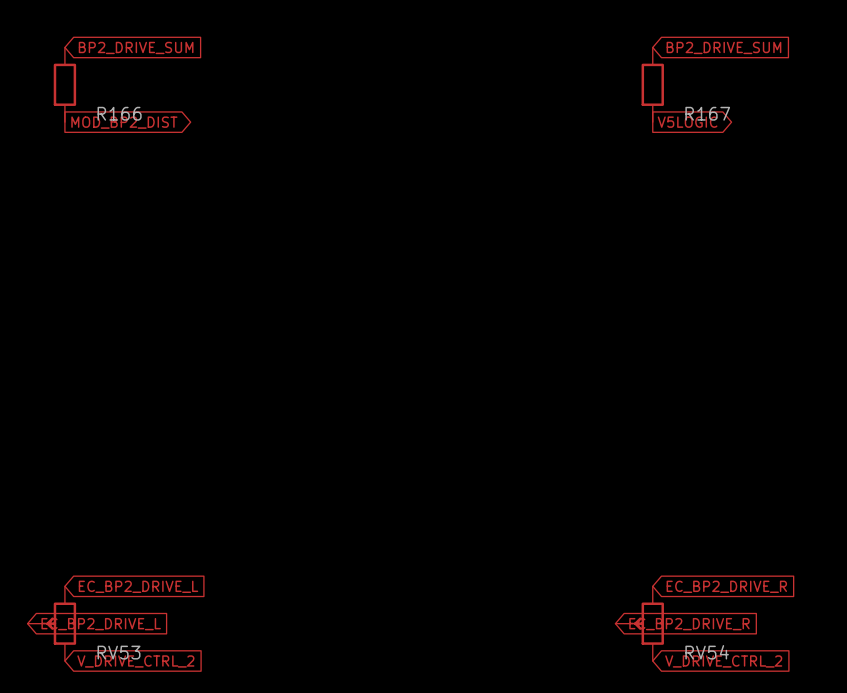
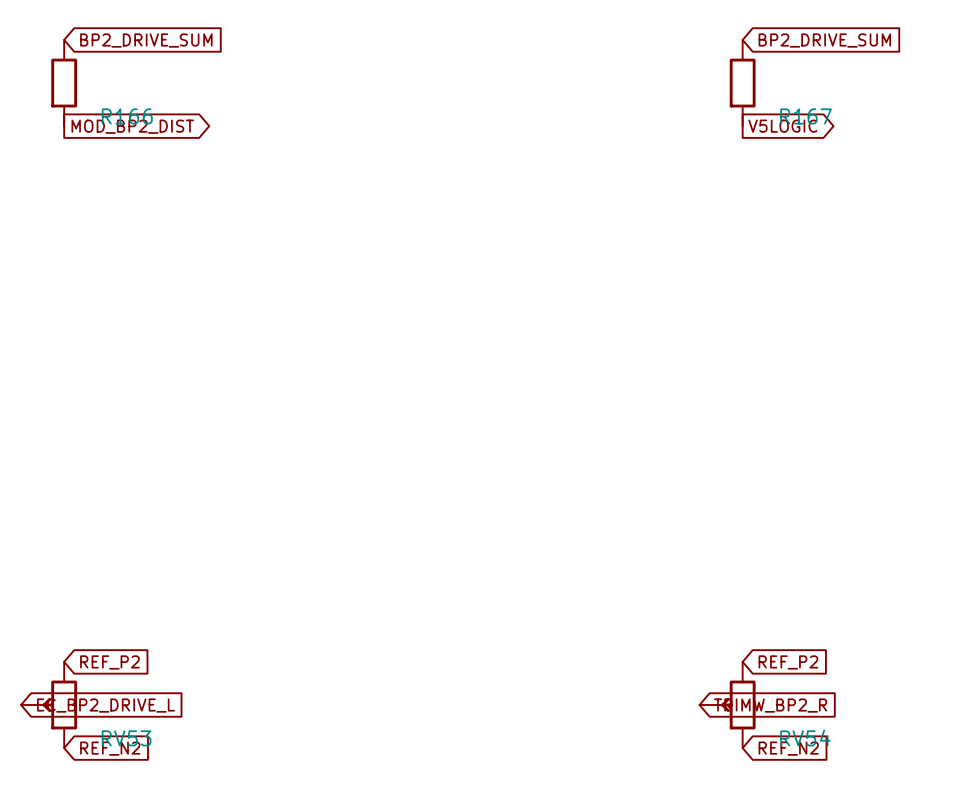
global label: EC_BP2_DRIVE_L (138, 586) -> REF_P2 (109, 662)
global label: EC_BP2_DRIVE_R (726, 586) -> REF_P2 (788, 662)
global label: EC_BP2_DRIVE_R (689, 624) -> TRIMW_BP2_R (770, 705)
global label: V_DRIVE_CTRL_2 (135, 661) -> REF_N2 (110, 748)
global label: V_DRIVE_CTRL_2 (723, 661) -> REF_N2 (788, 748)

